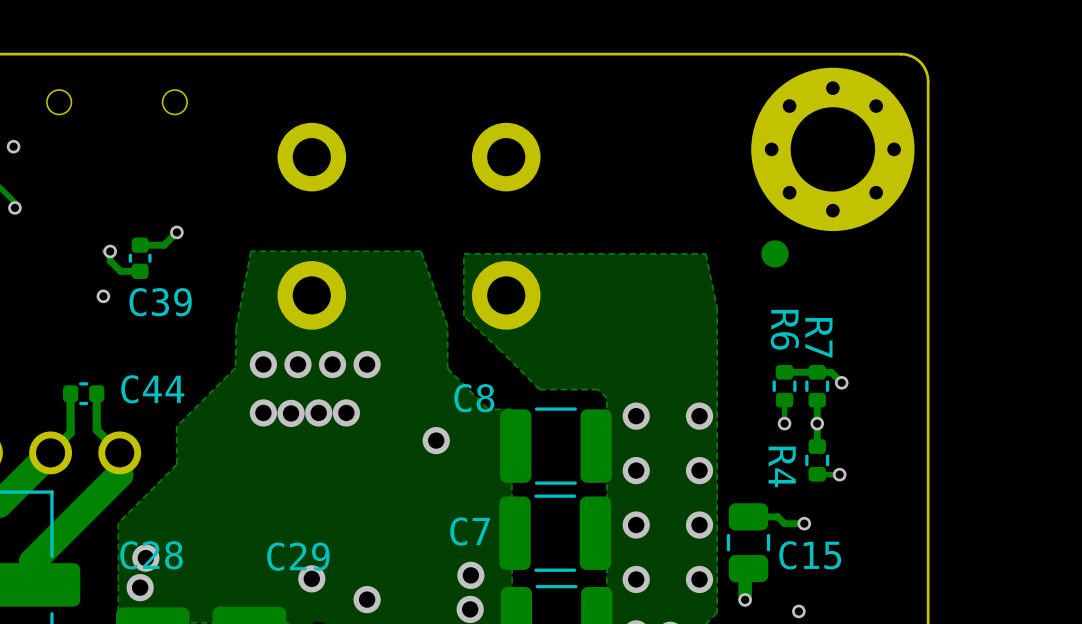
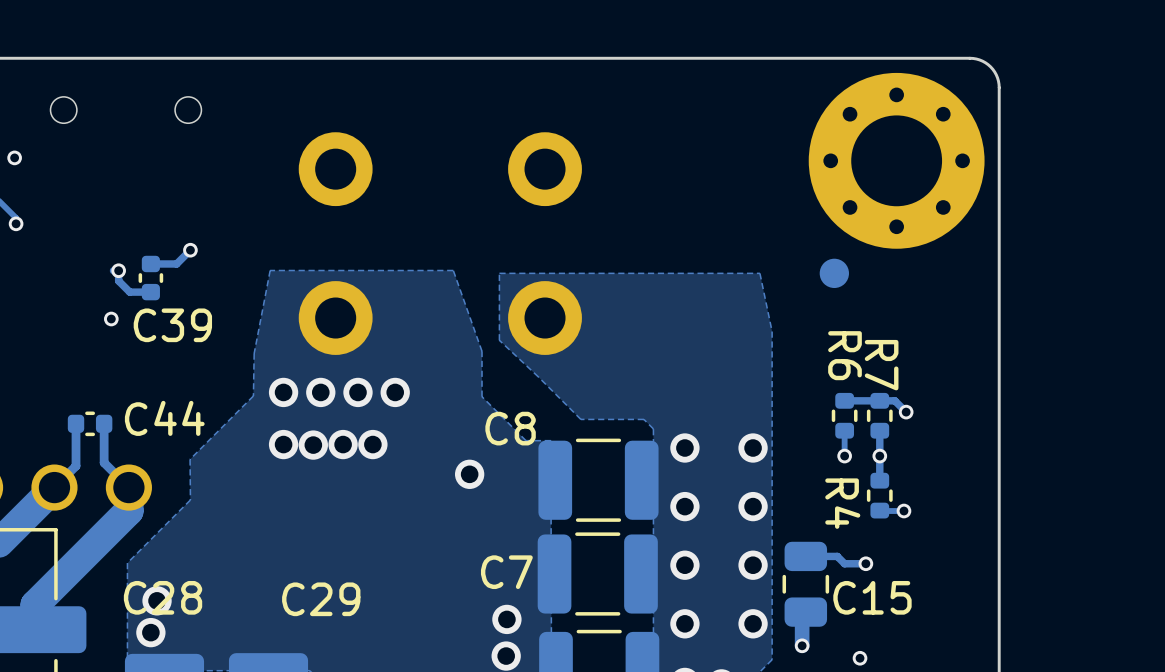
via: (311, 578) -> none
via: (367, 599) -> none

